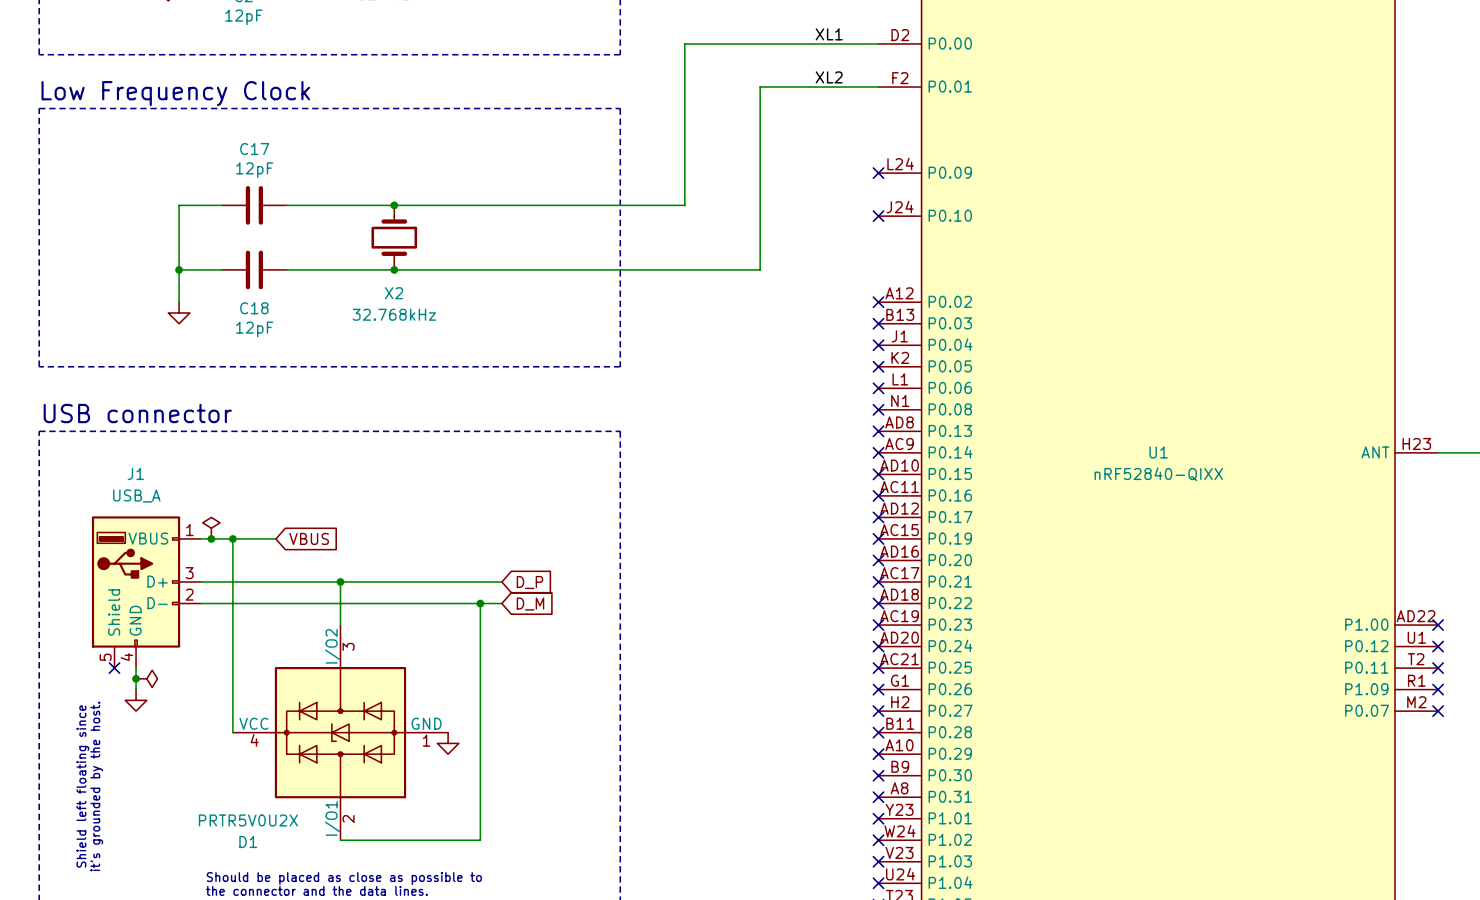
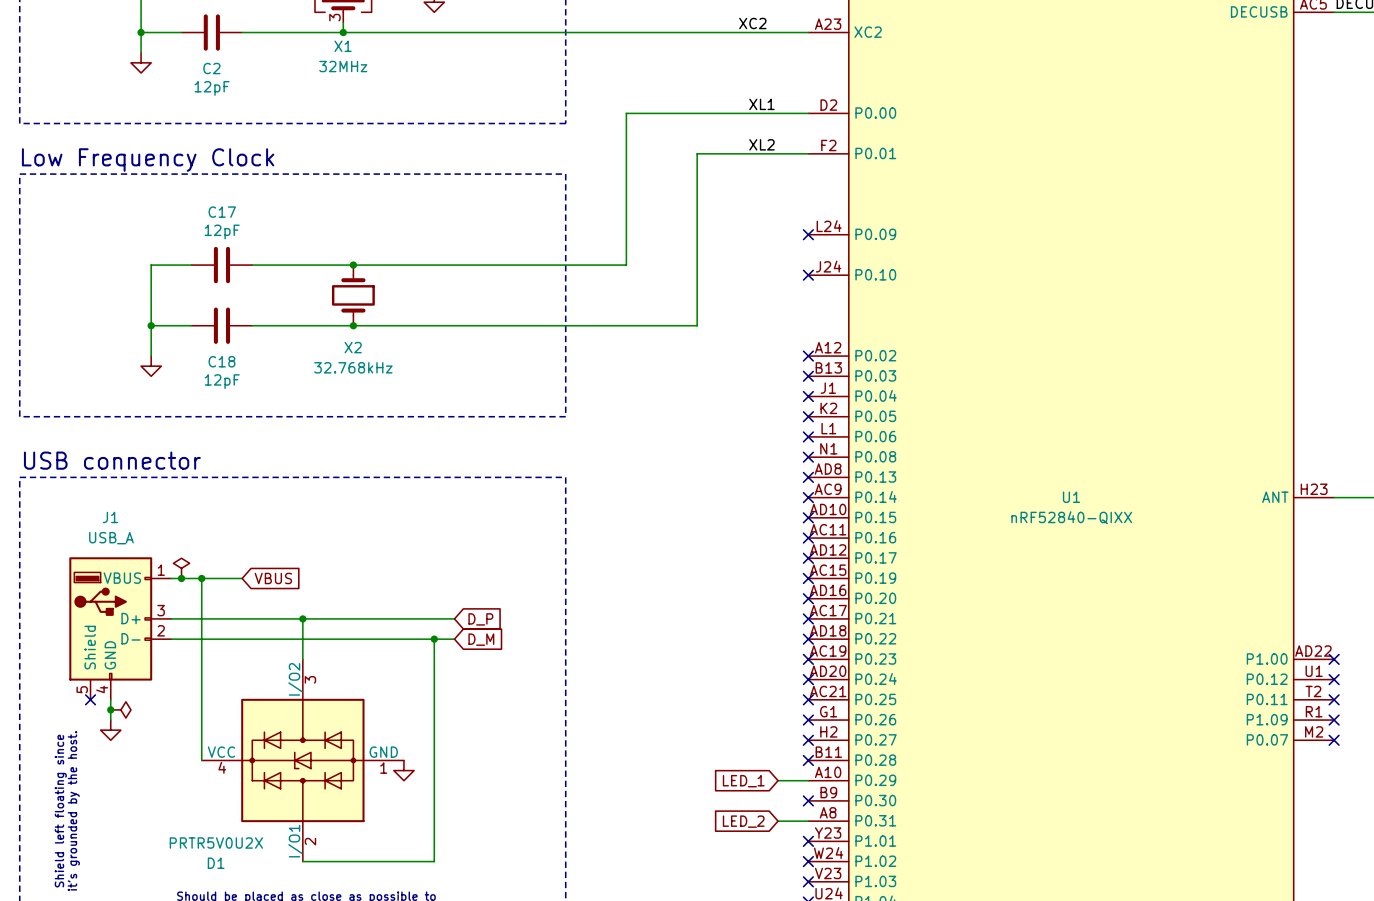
global label: none -> LED_1 (743, 781)
wire: none -> (778, 780) (808, 780)
no-connect mark: (878, 754) -> none
global label: none -> LED_2 (743, 821)
wire: none -> (778, 821) (808, 821)
no-connect mark: (878, 797) -> none

